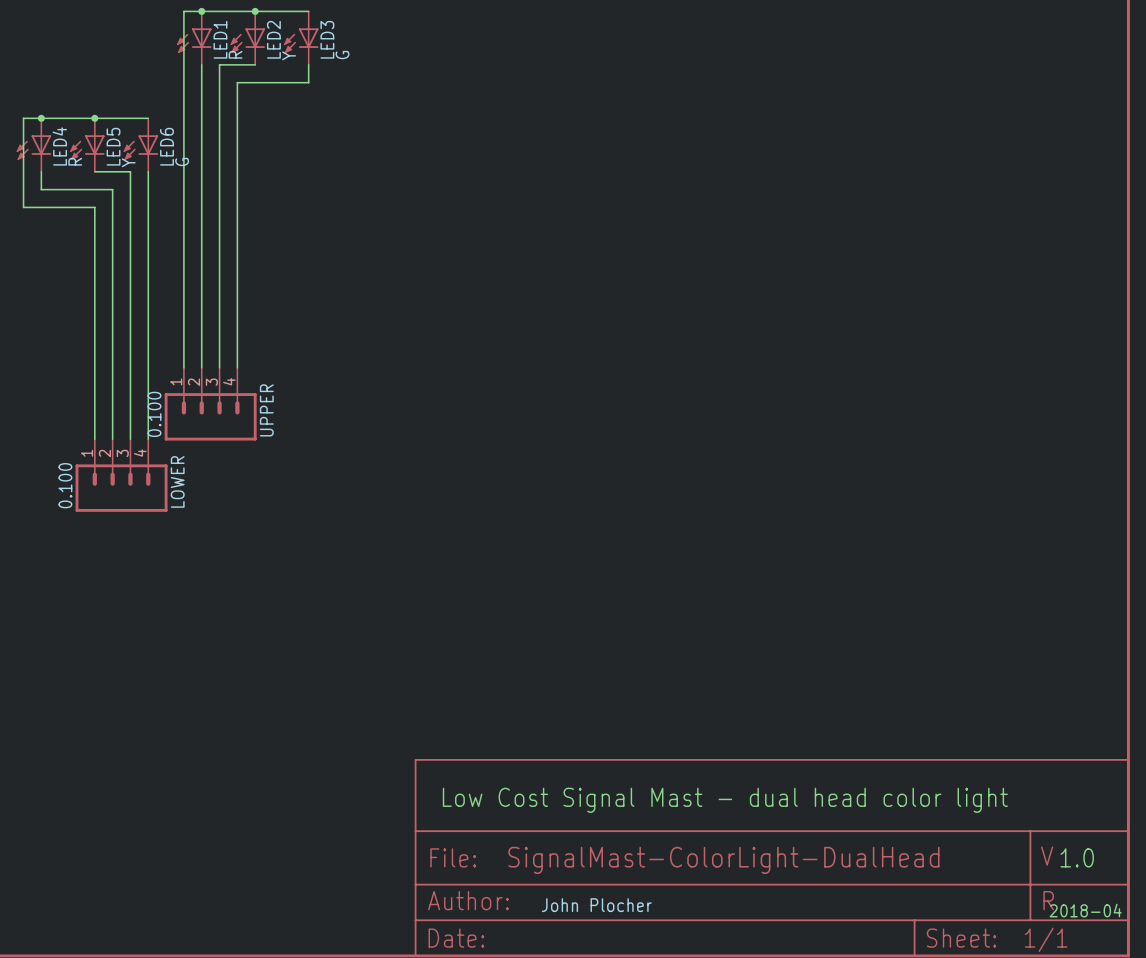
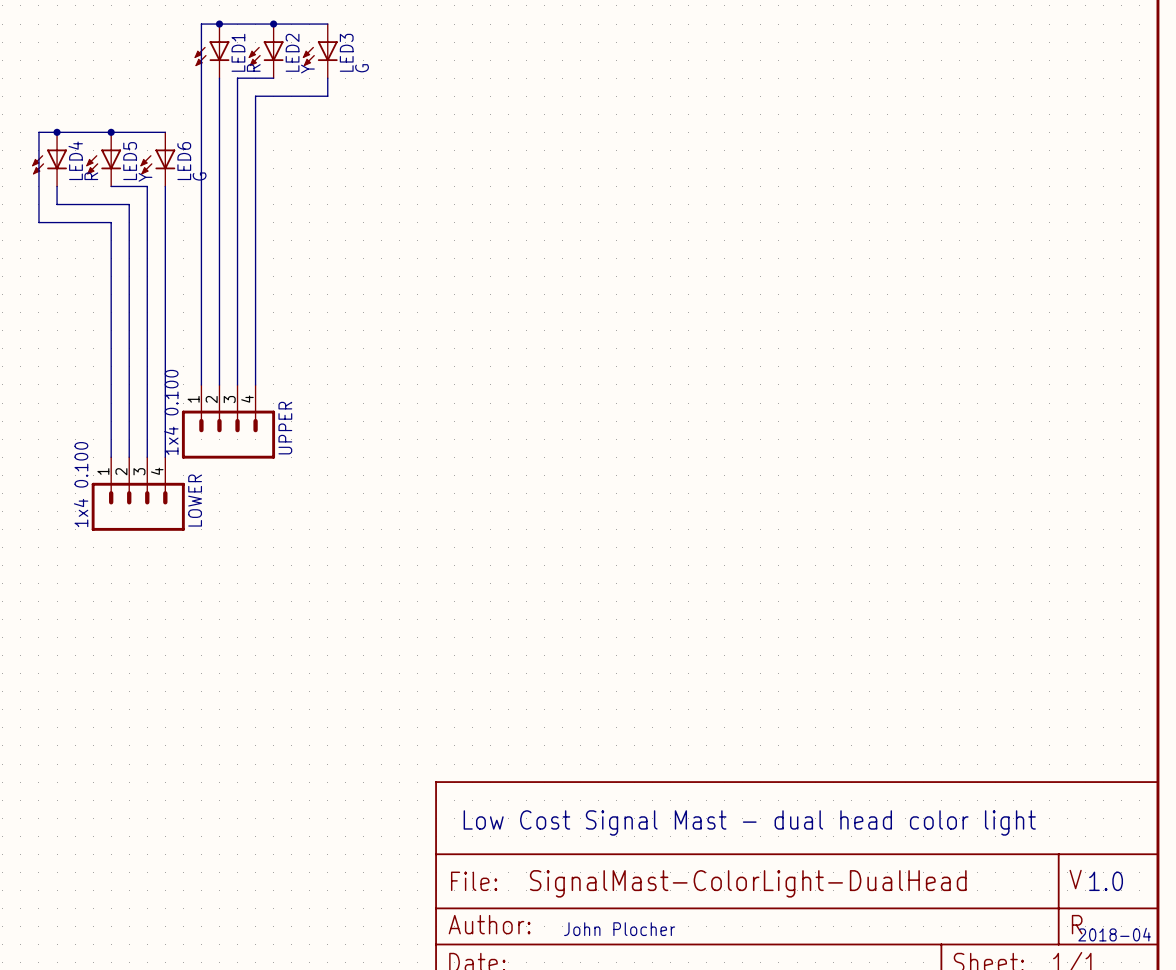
UPPER value: 0.100 (154, 414) -> 1x4 0.100 (171, 412)
LOWER value: 0.100 (65, 485) -> 1x4 0.100 (81, 484)

